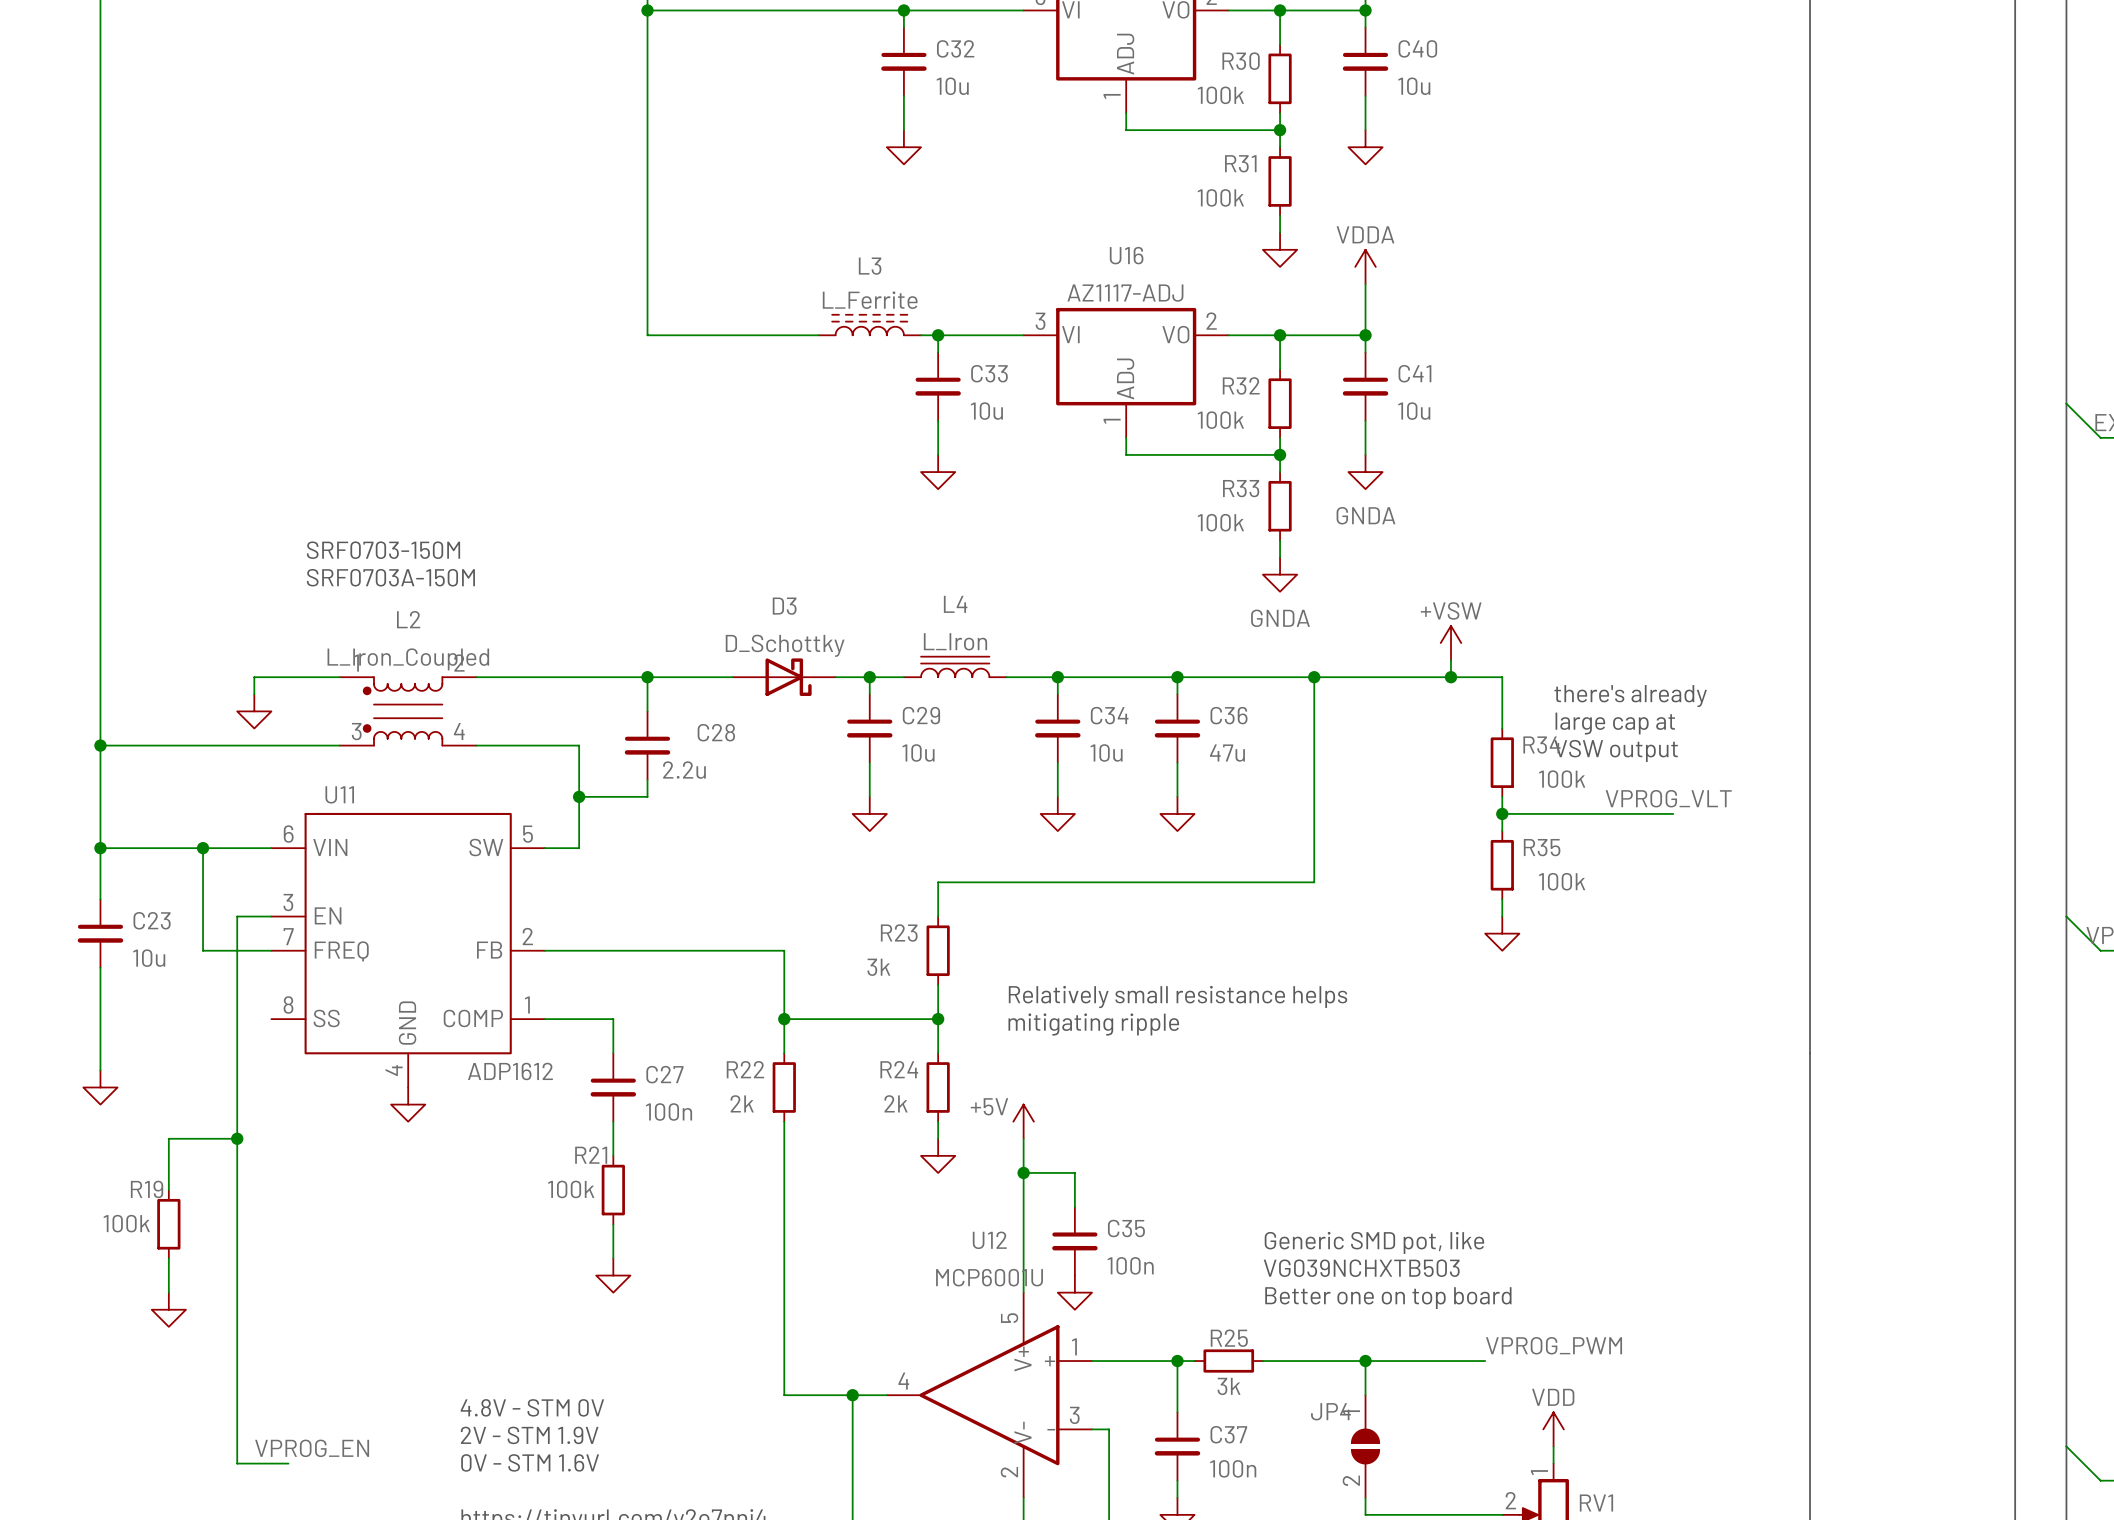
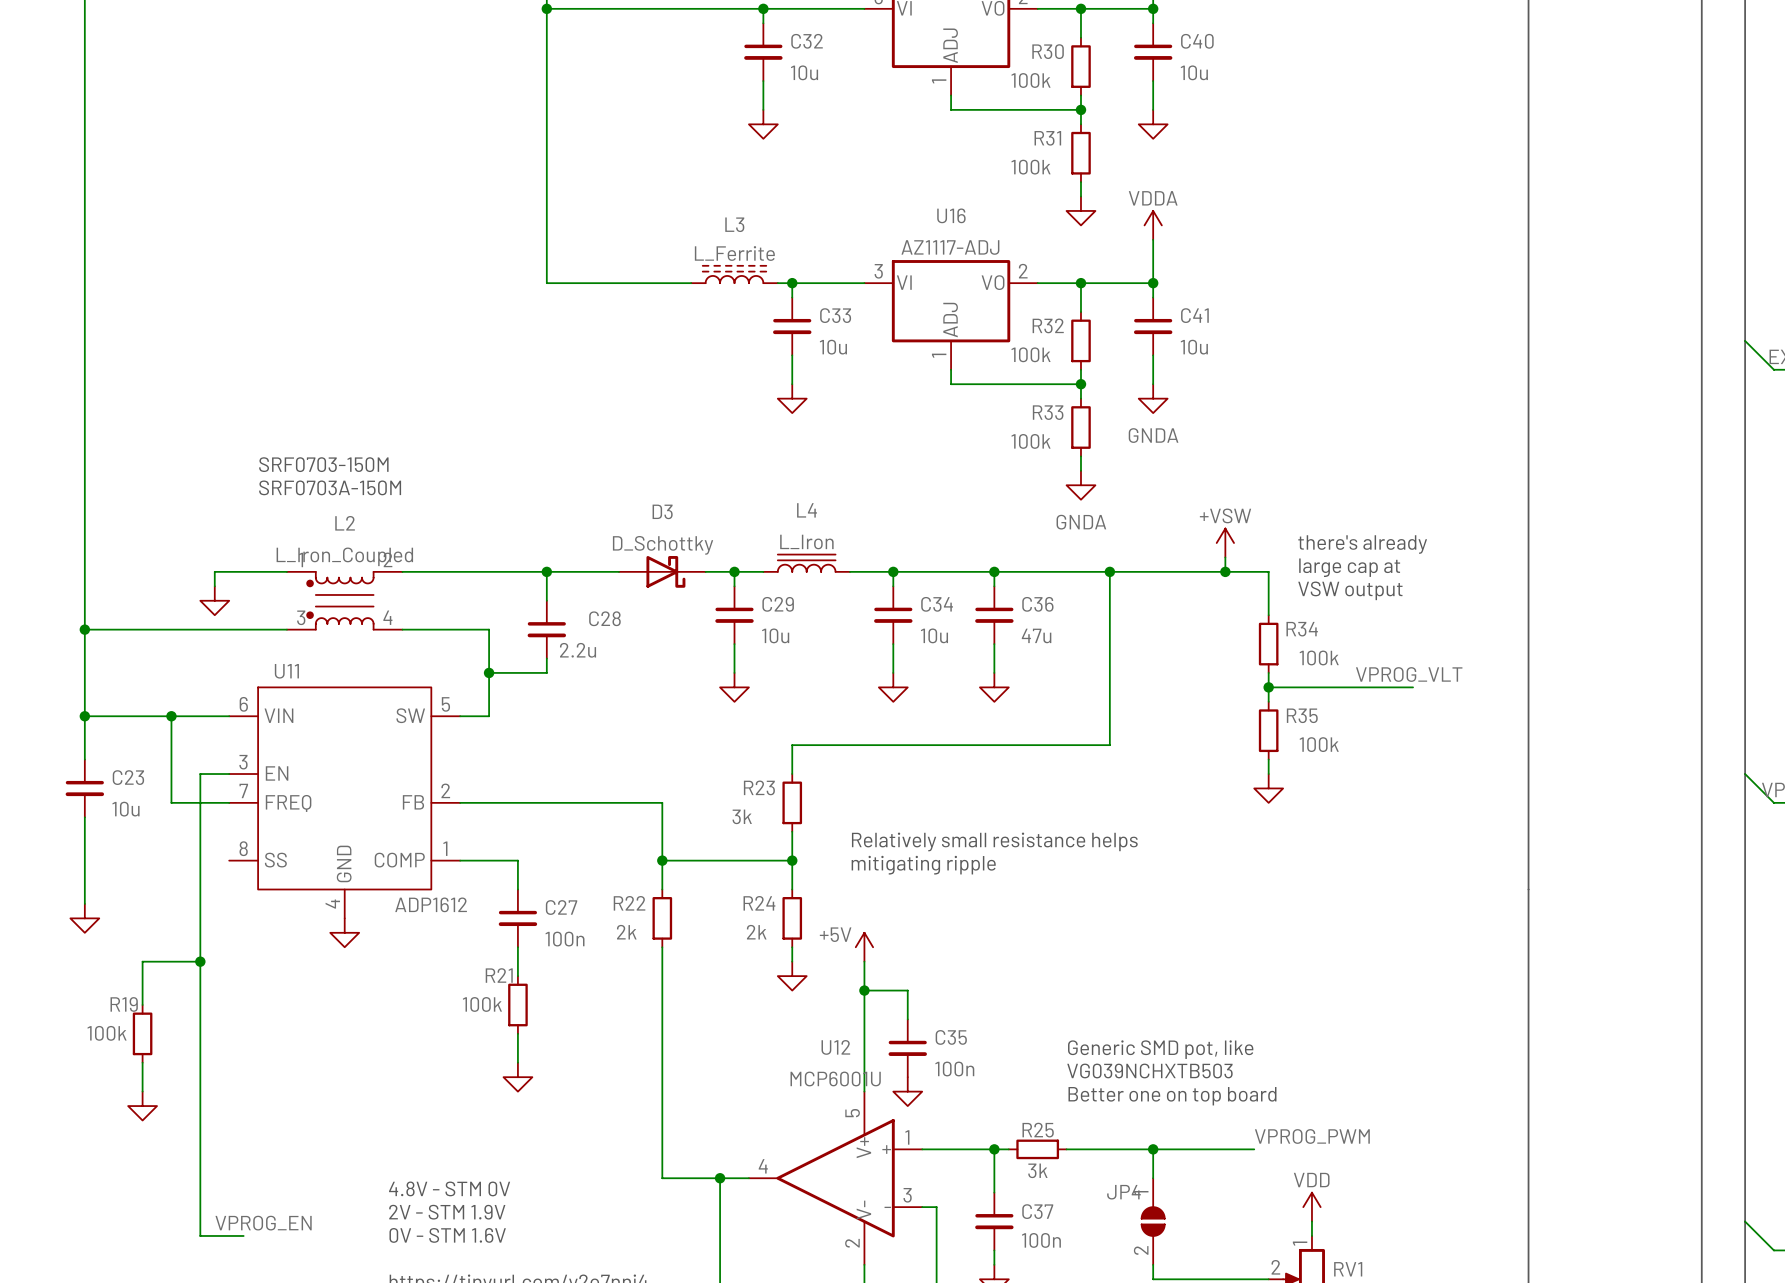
text position: there's already (1630, 696) -> there's already (1362, 544)
text position: large cap at (1615, 723) -> large cap at (1349, 567)
text position: VSW output (1616, 750) -> VSW output (1350, 590)

